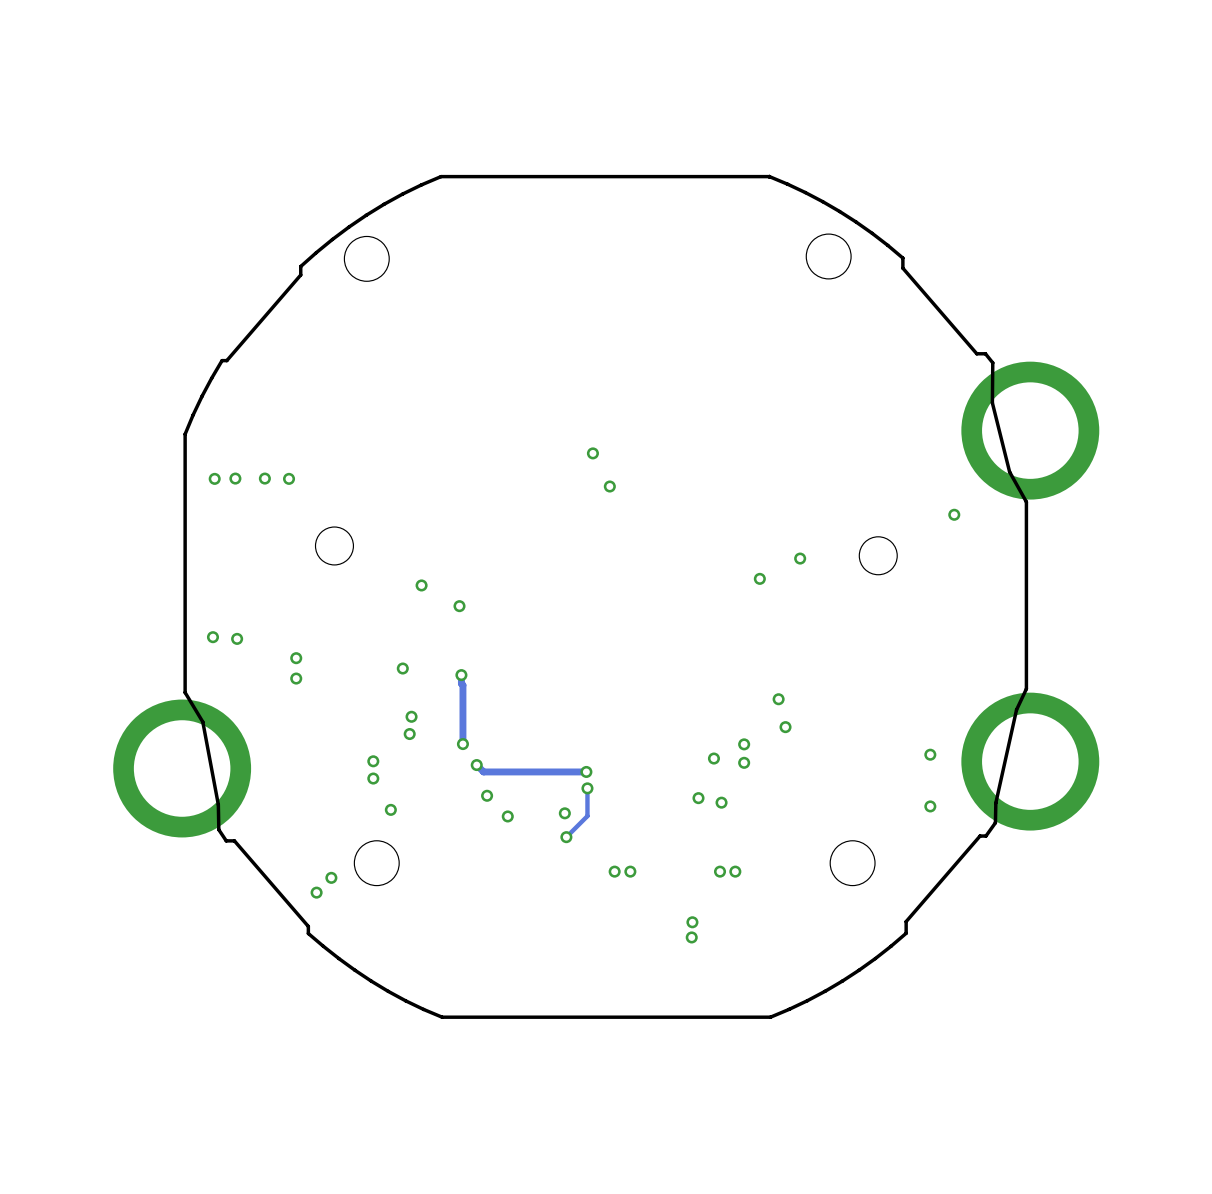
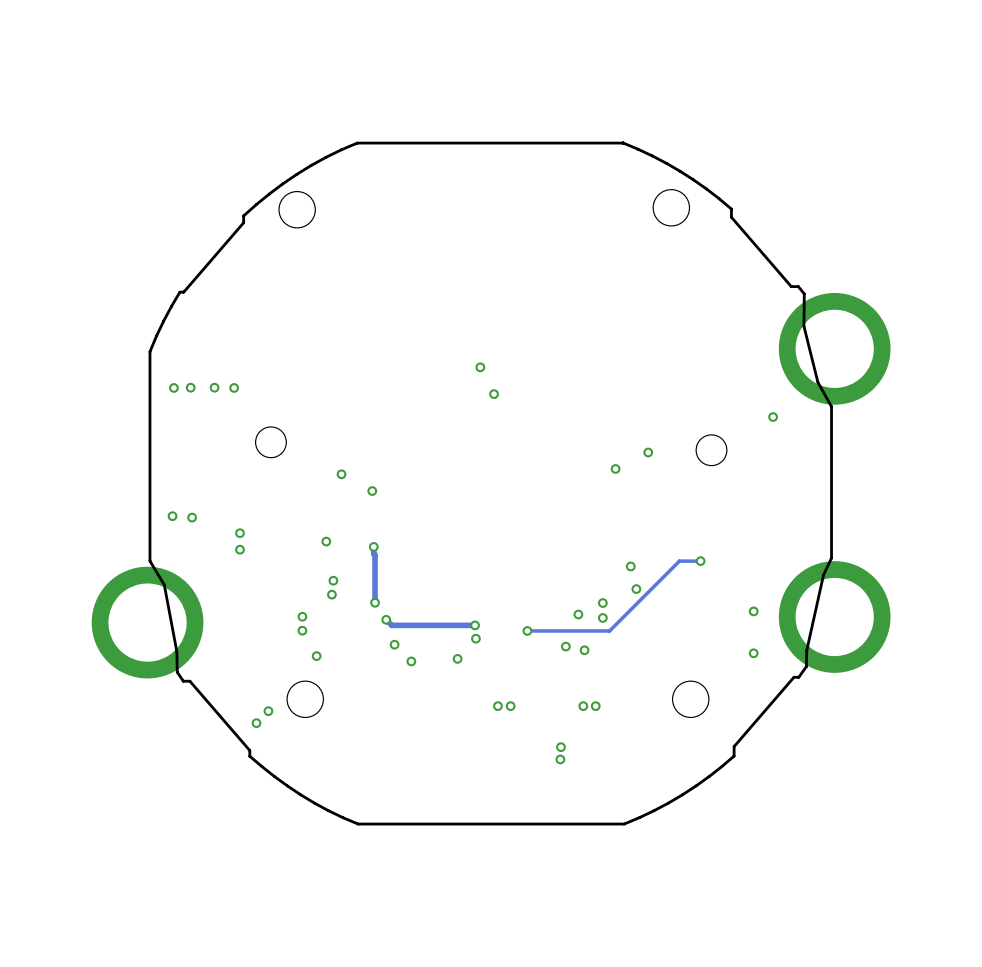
track: none -> (700, 561) (679, 561) (609, 630) (527, 630)
via: none -> (700, 561)
track: (587, 788) (587, 816) (566, 837) -> none
via position: (566, 837) -> (527, 630)

